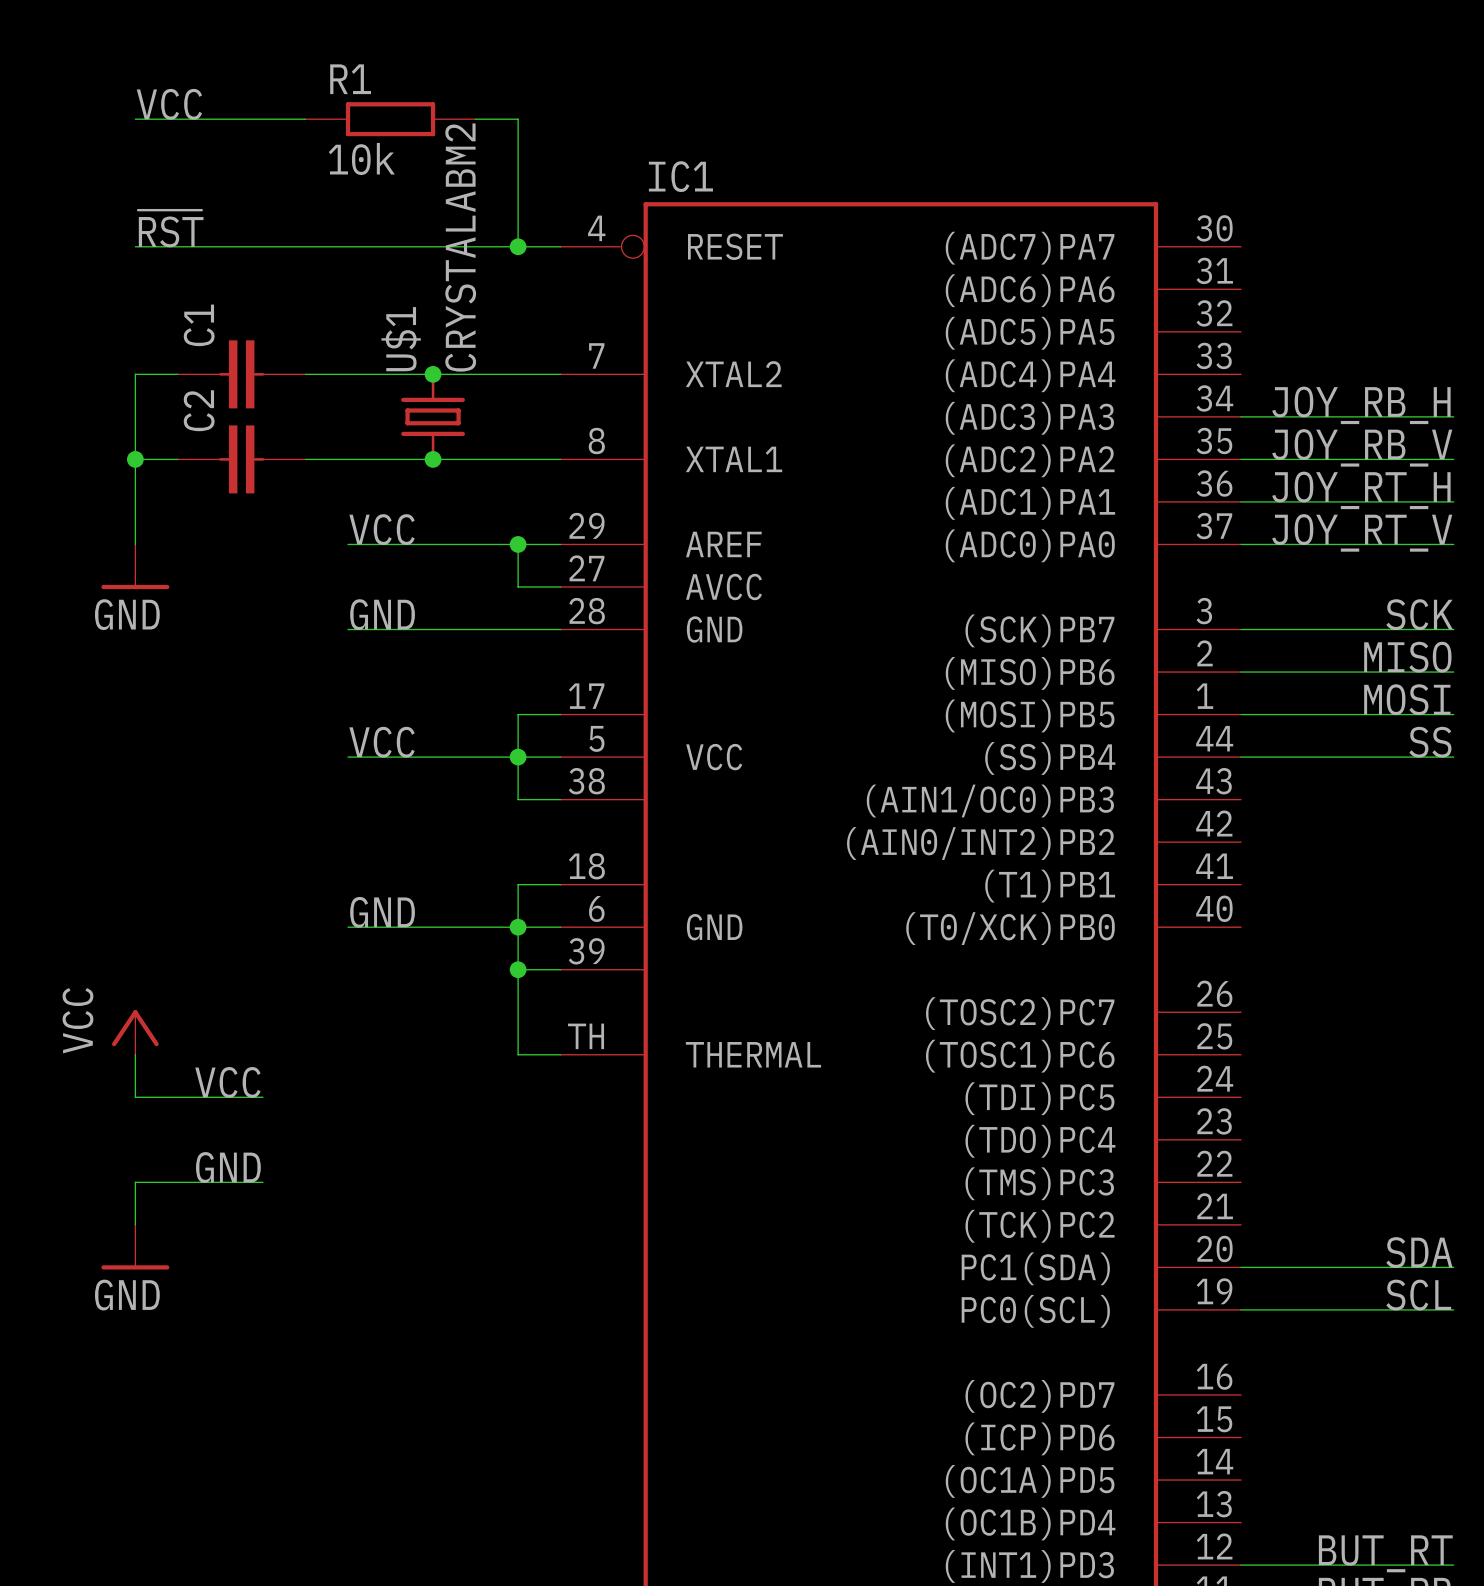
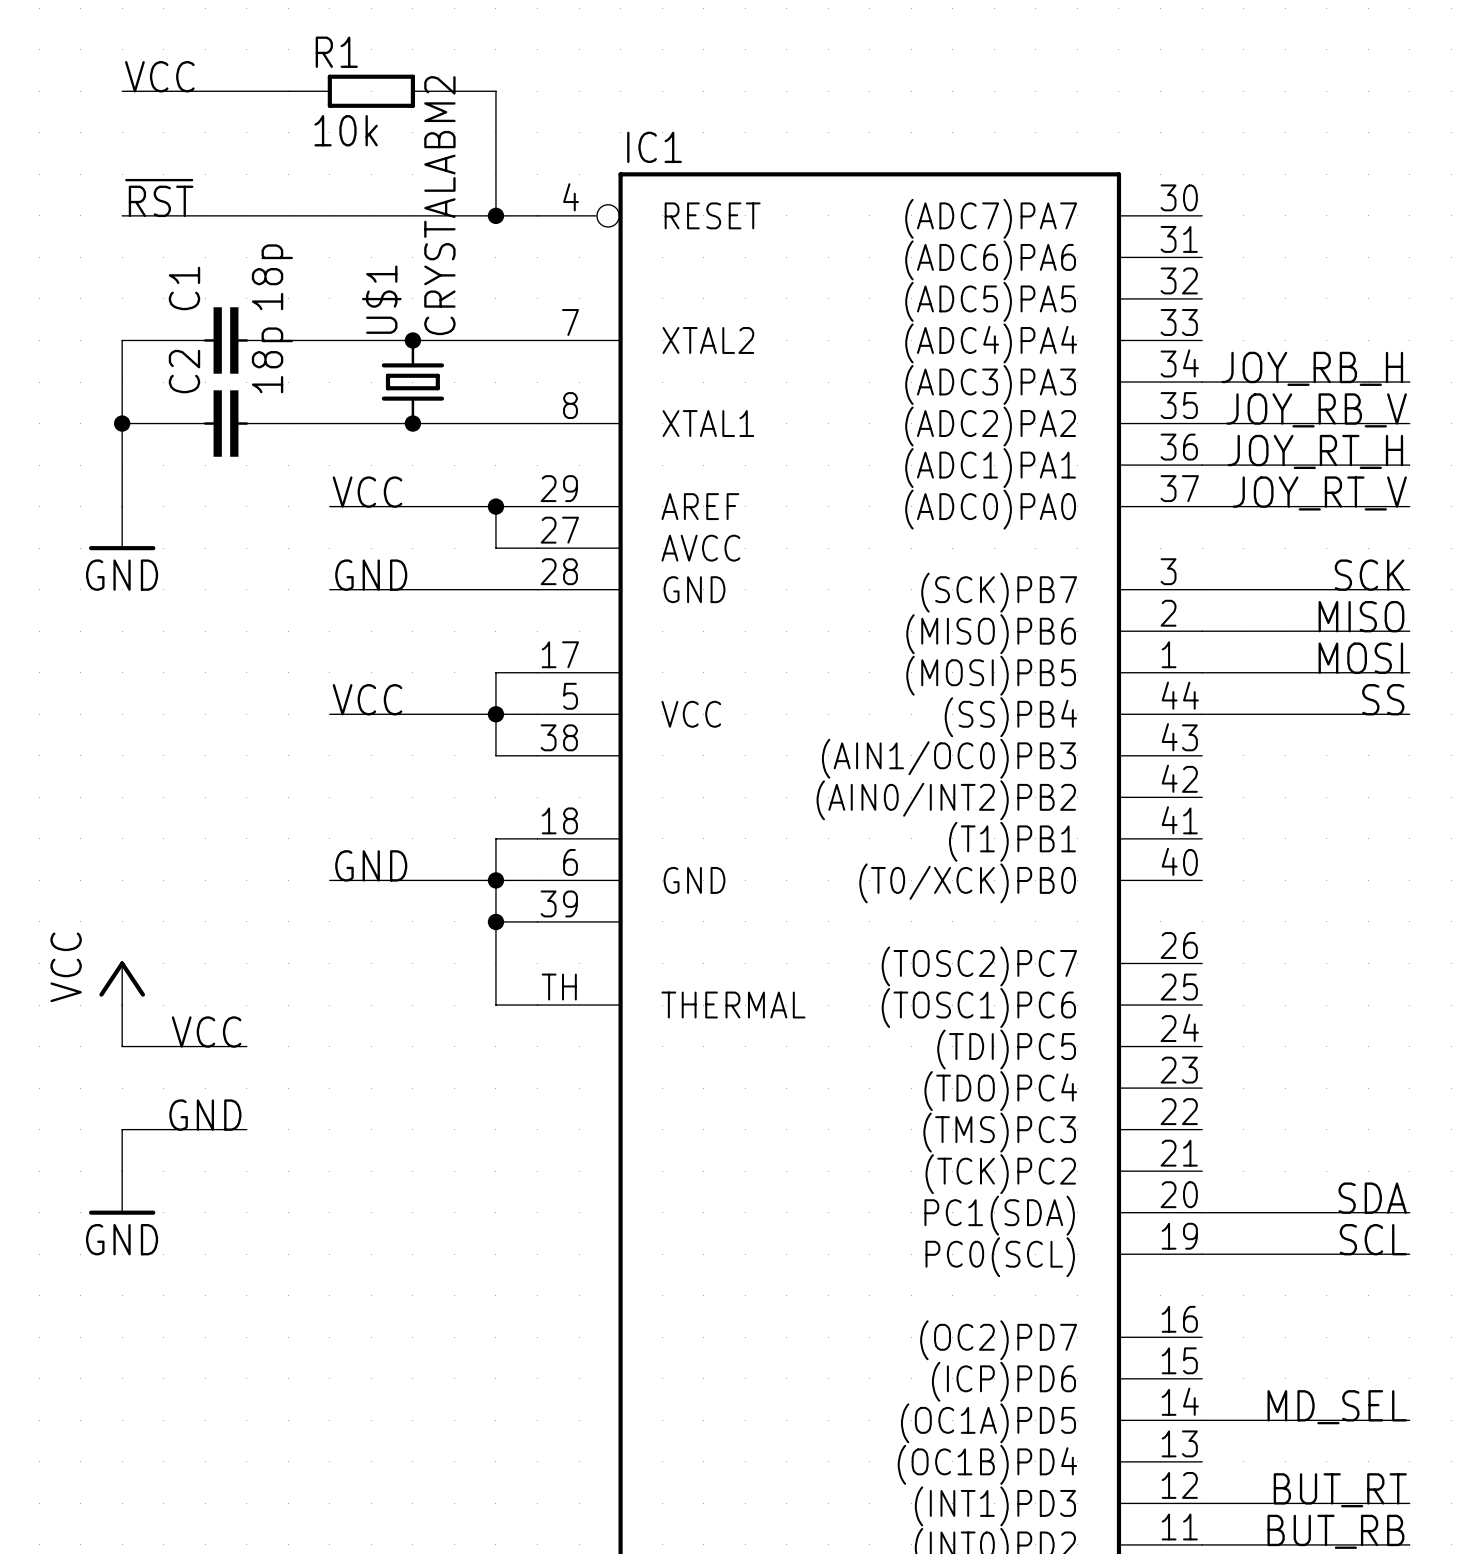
C1 value: none -> 18p (272, 277)
C2 value: none -> 18p (272, 360)
label: none -> MD_SEL (1337, 1407)
wire: none -> (1202, 1420) (1409, 1420)

